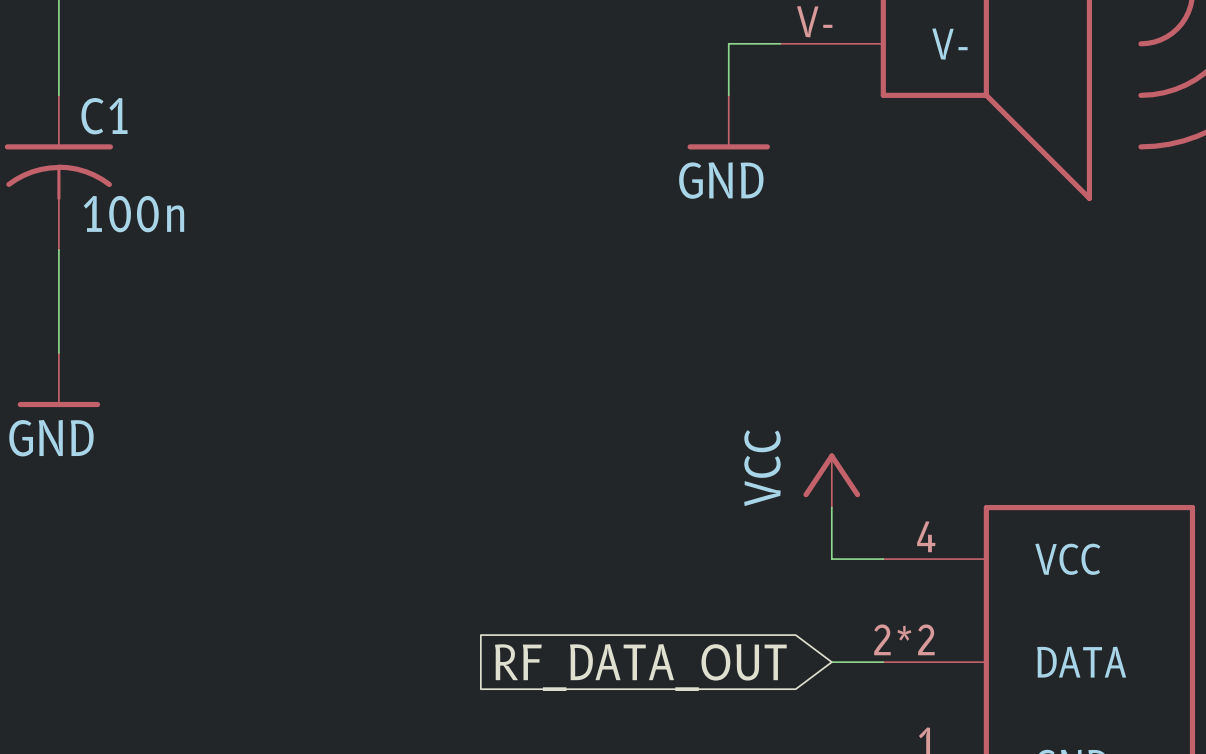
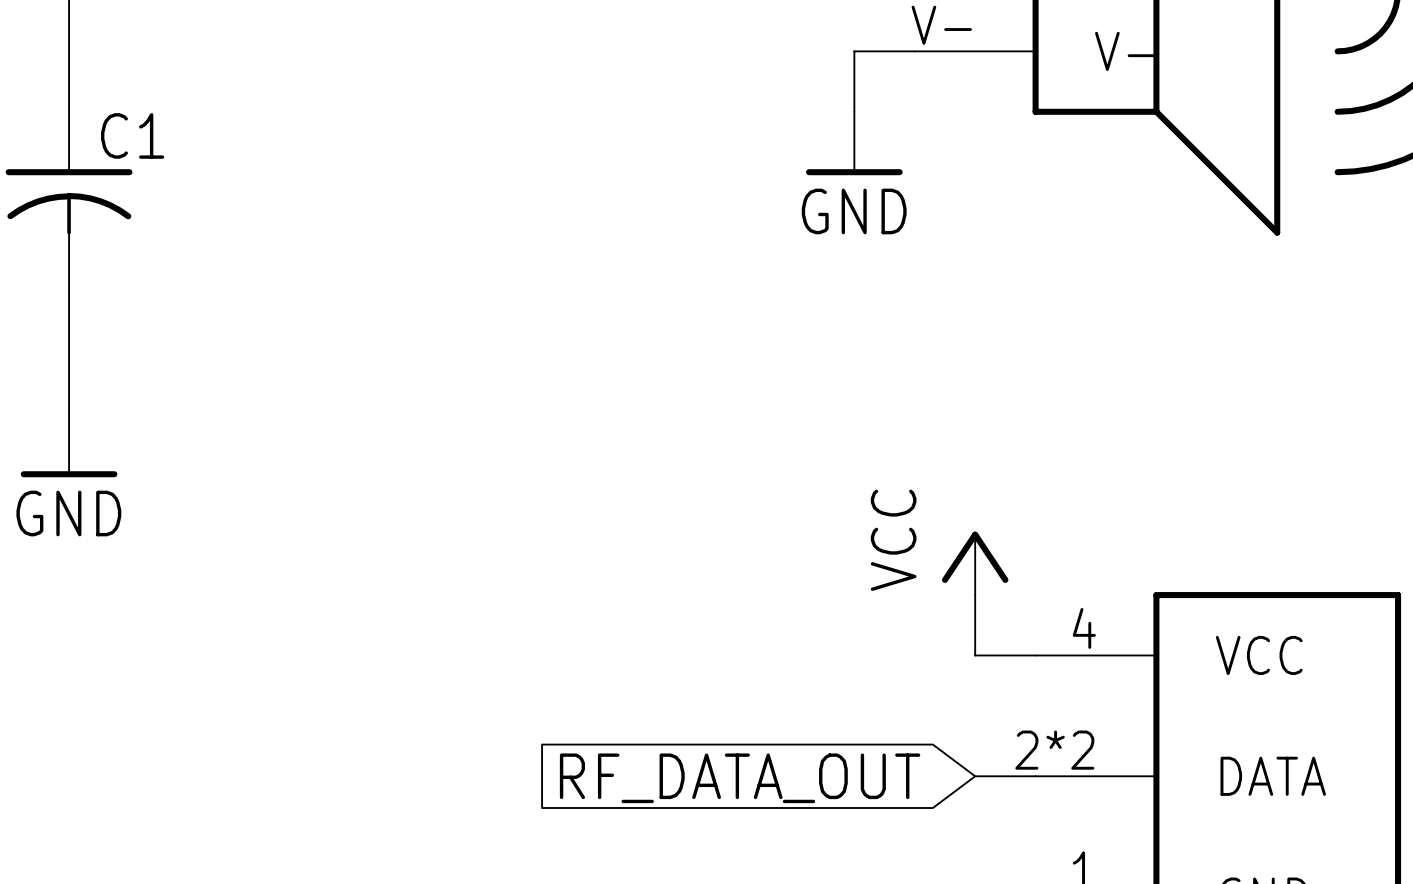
C1 value: 100n (133, 214) -> none

